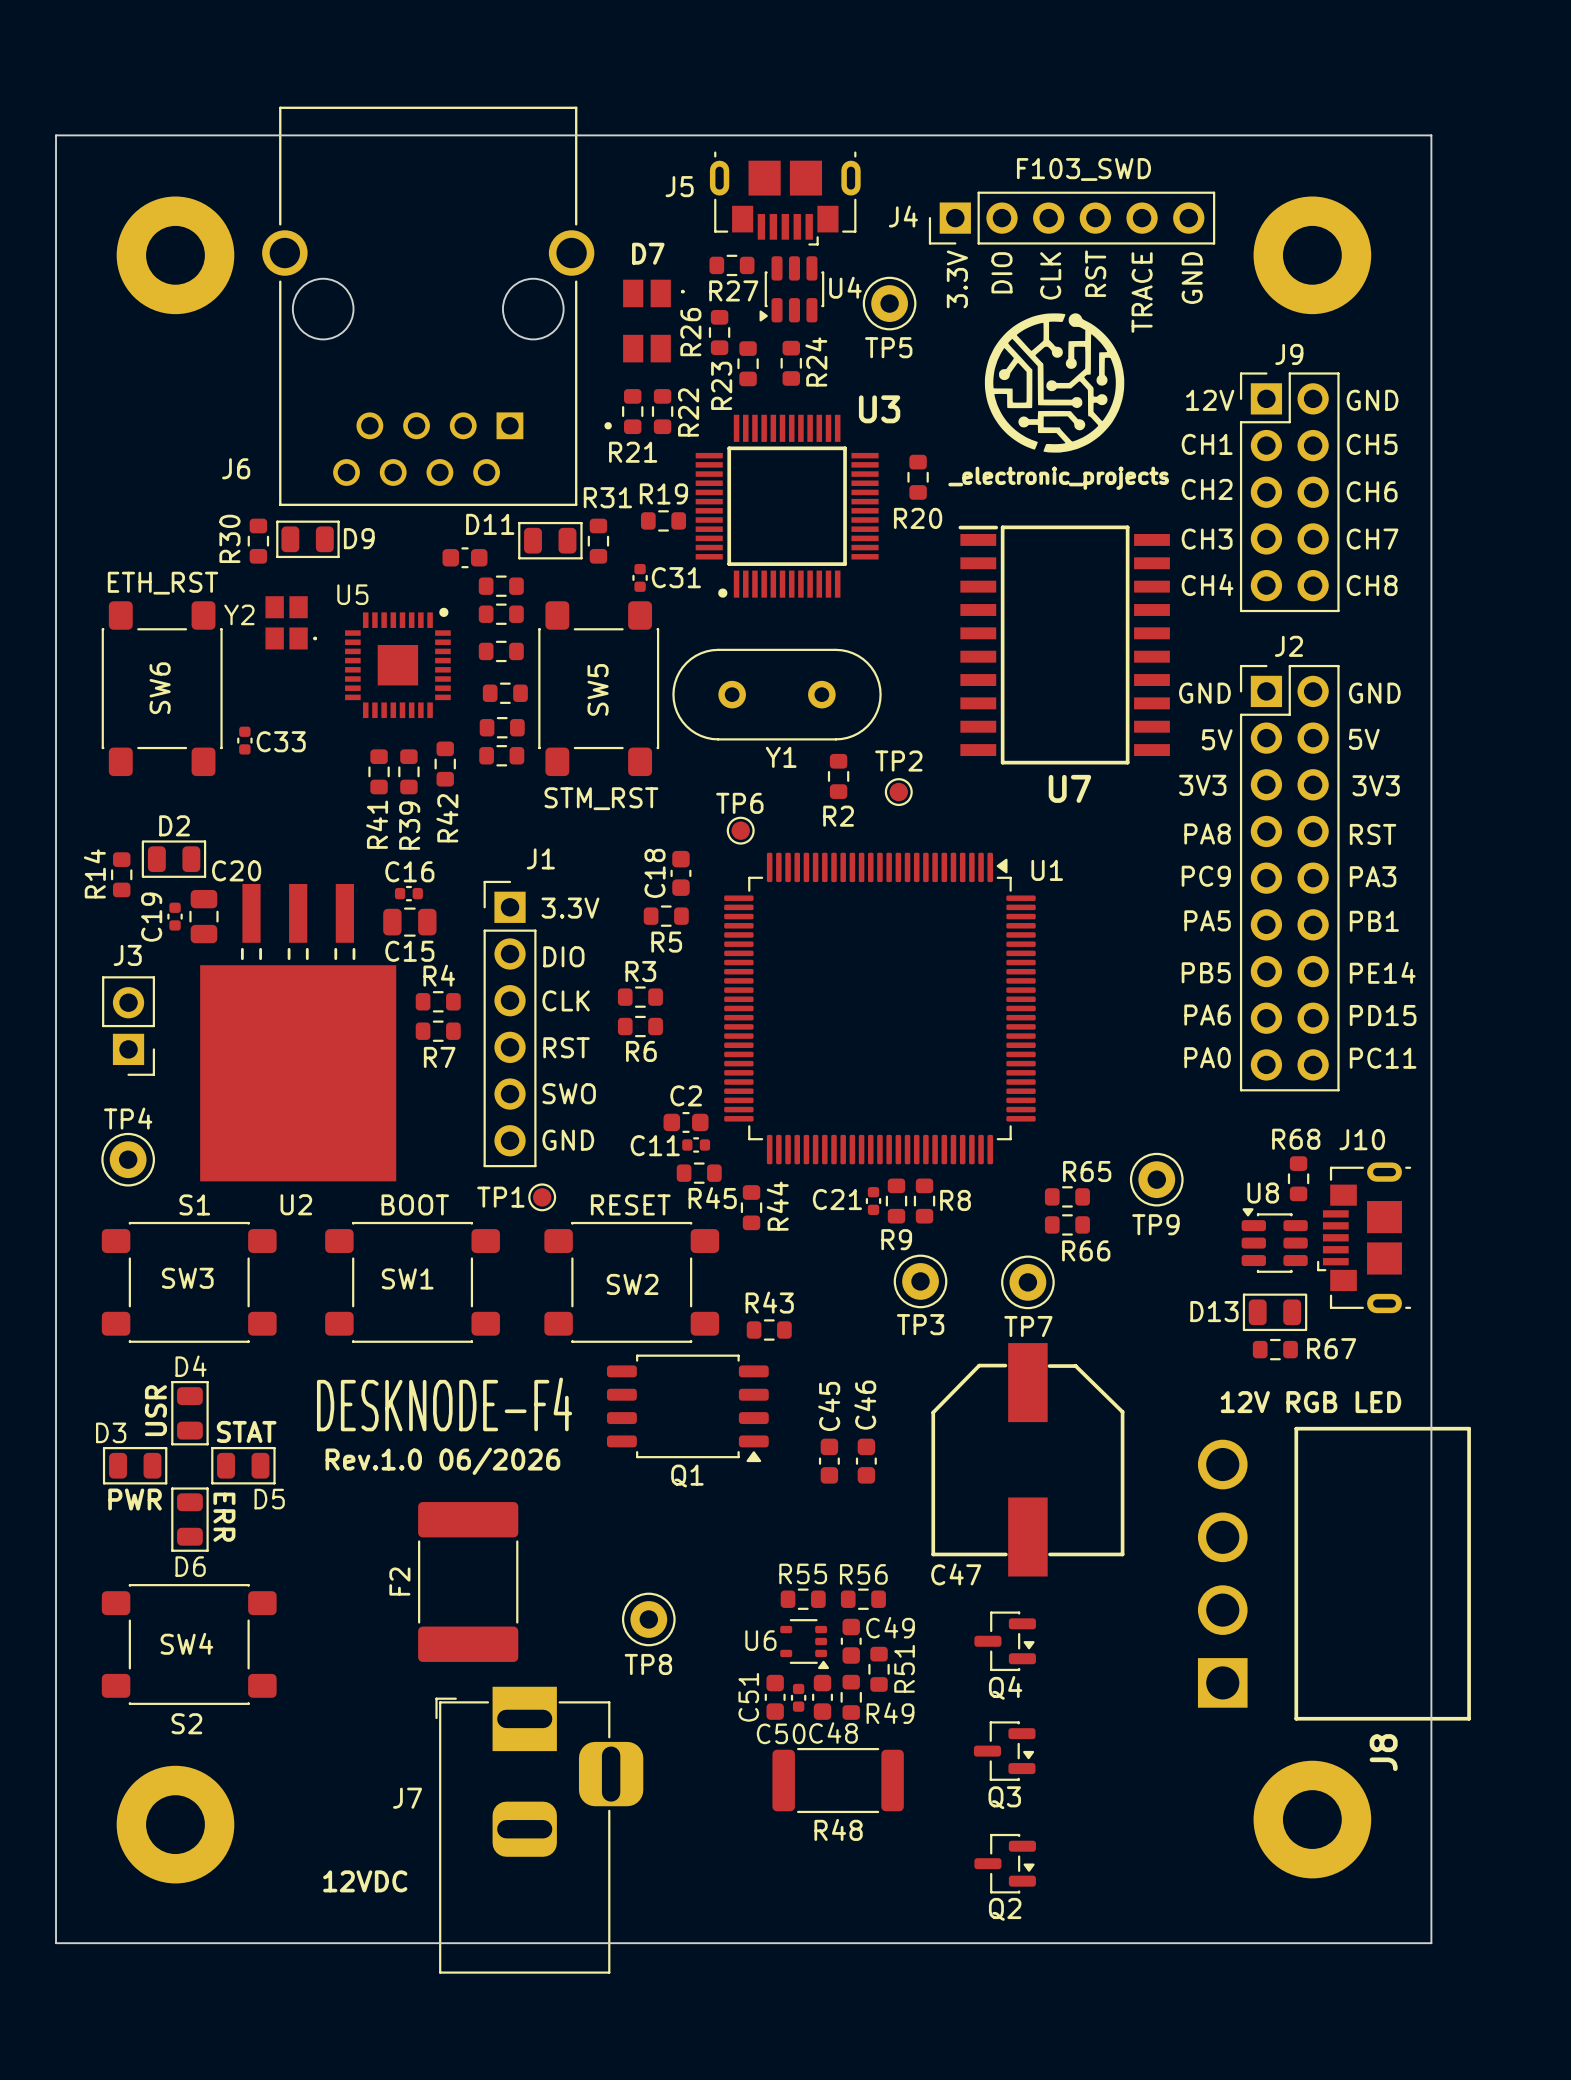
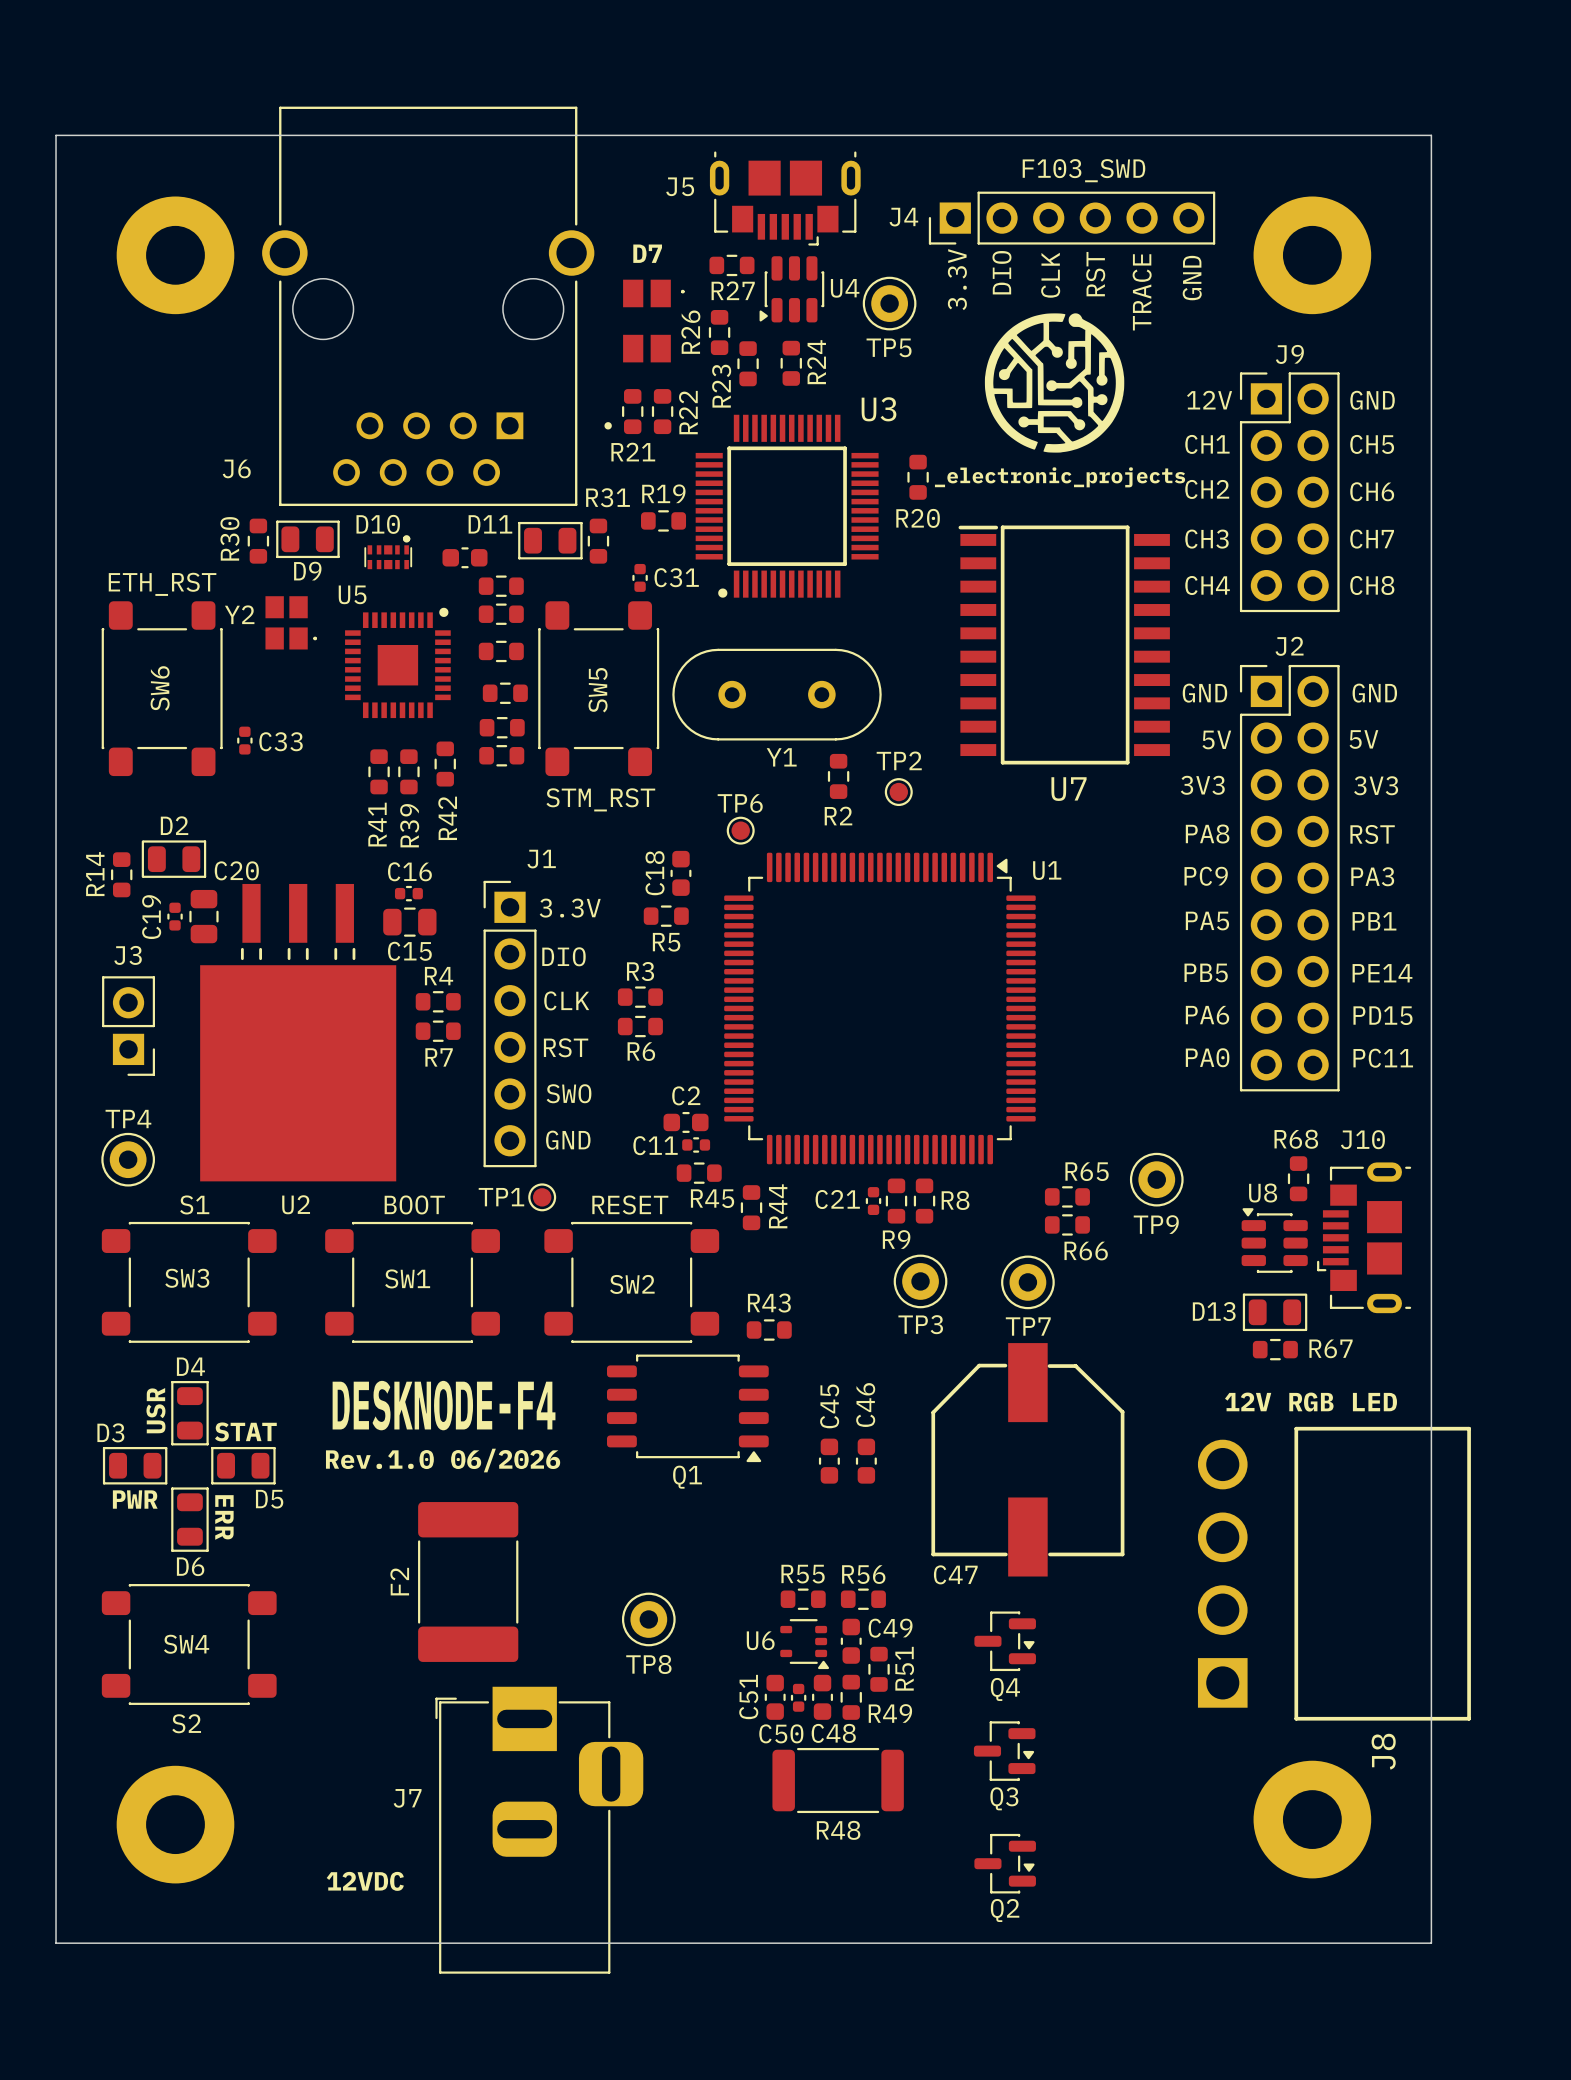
D9 name position: D9 (359, 538) -> D9 (307, 571)
D10: none -> (388, 552)

